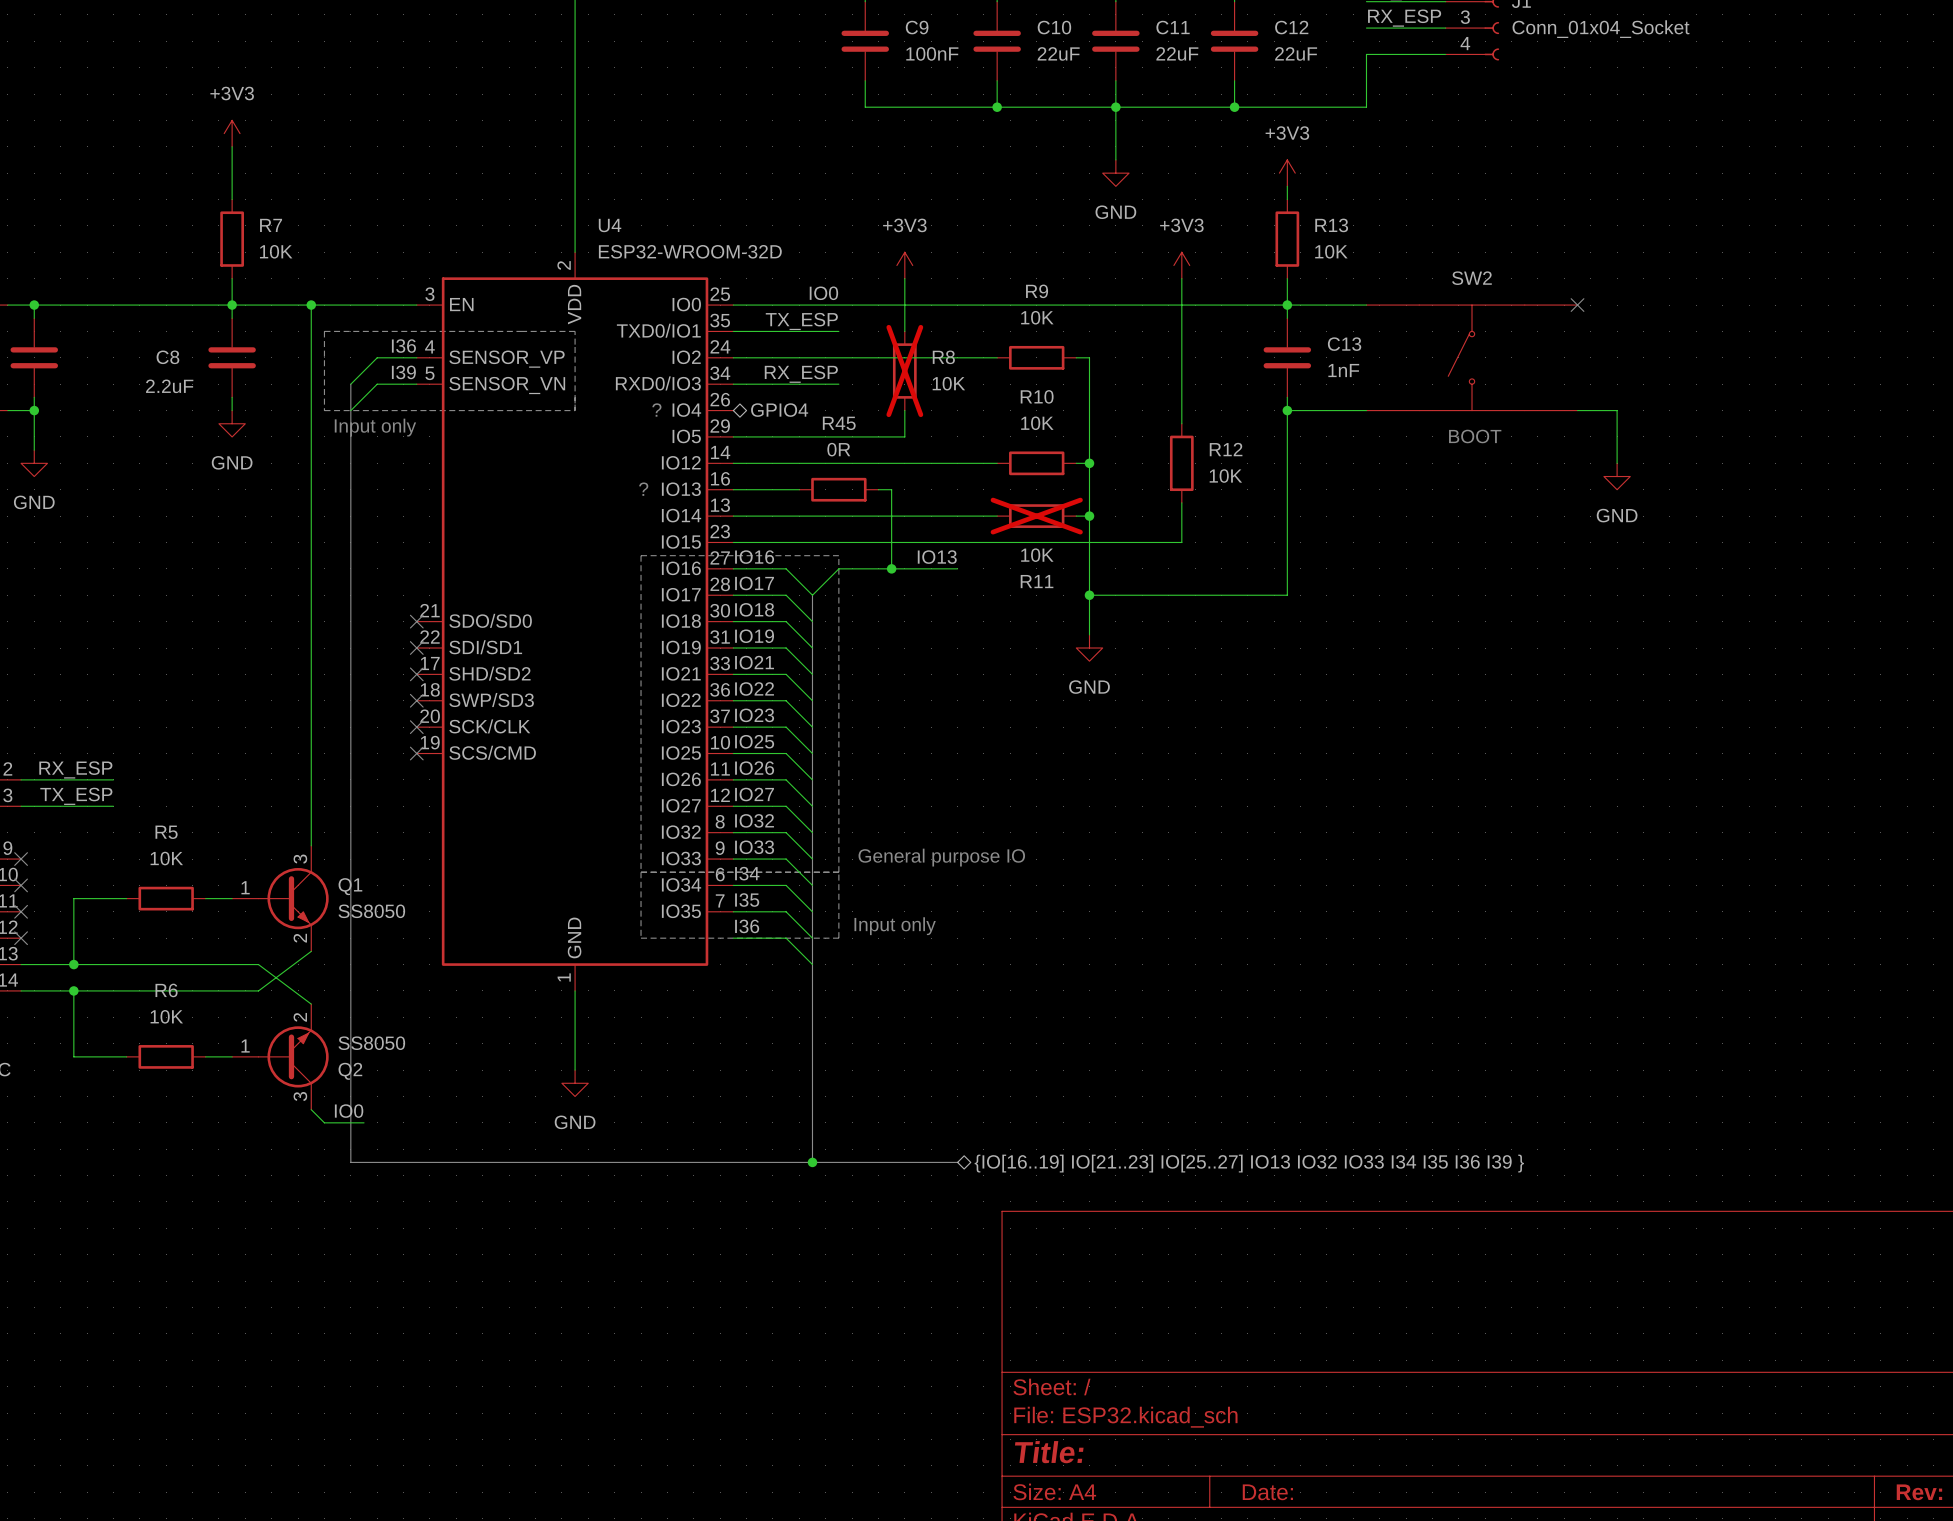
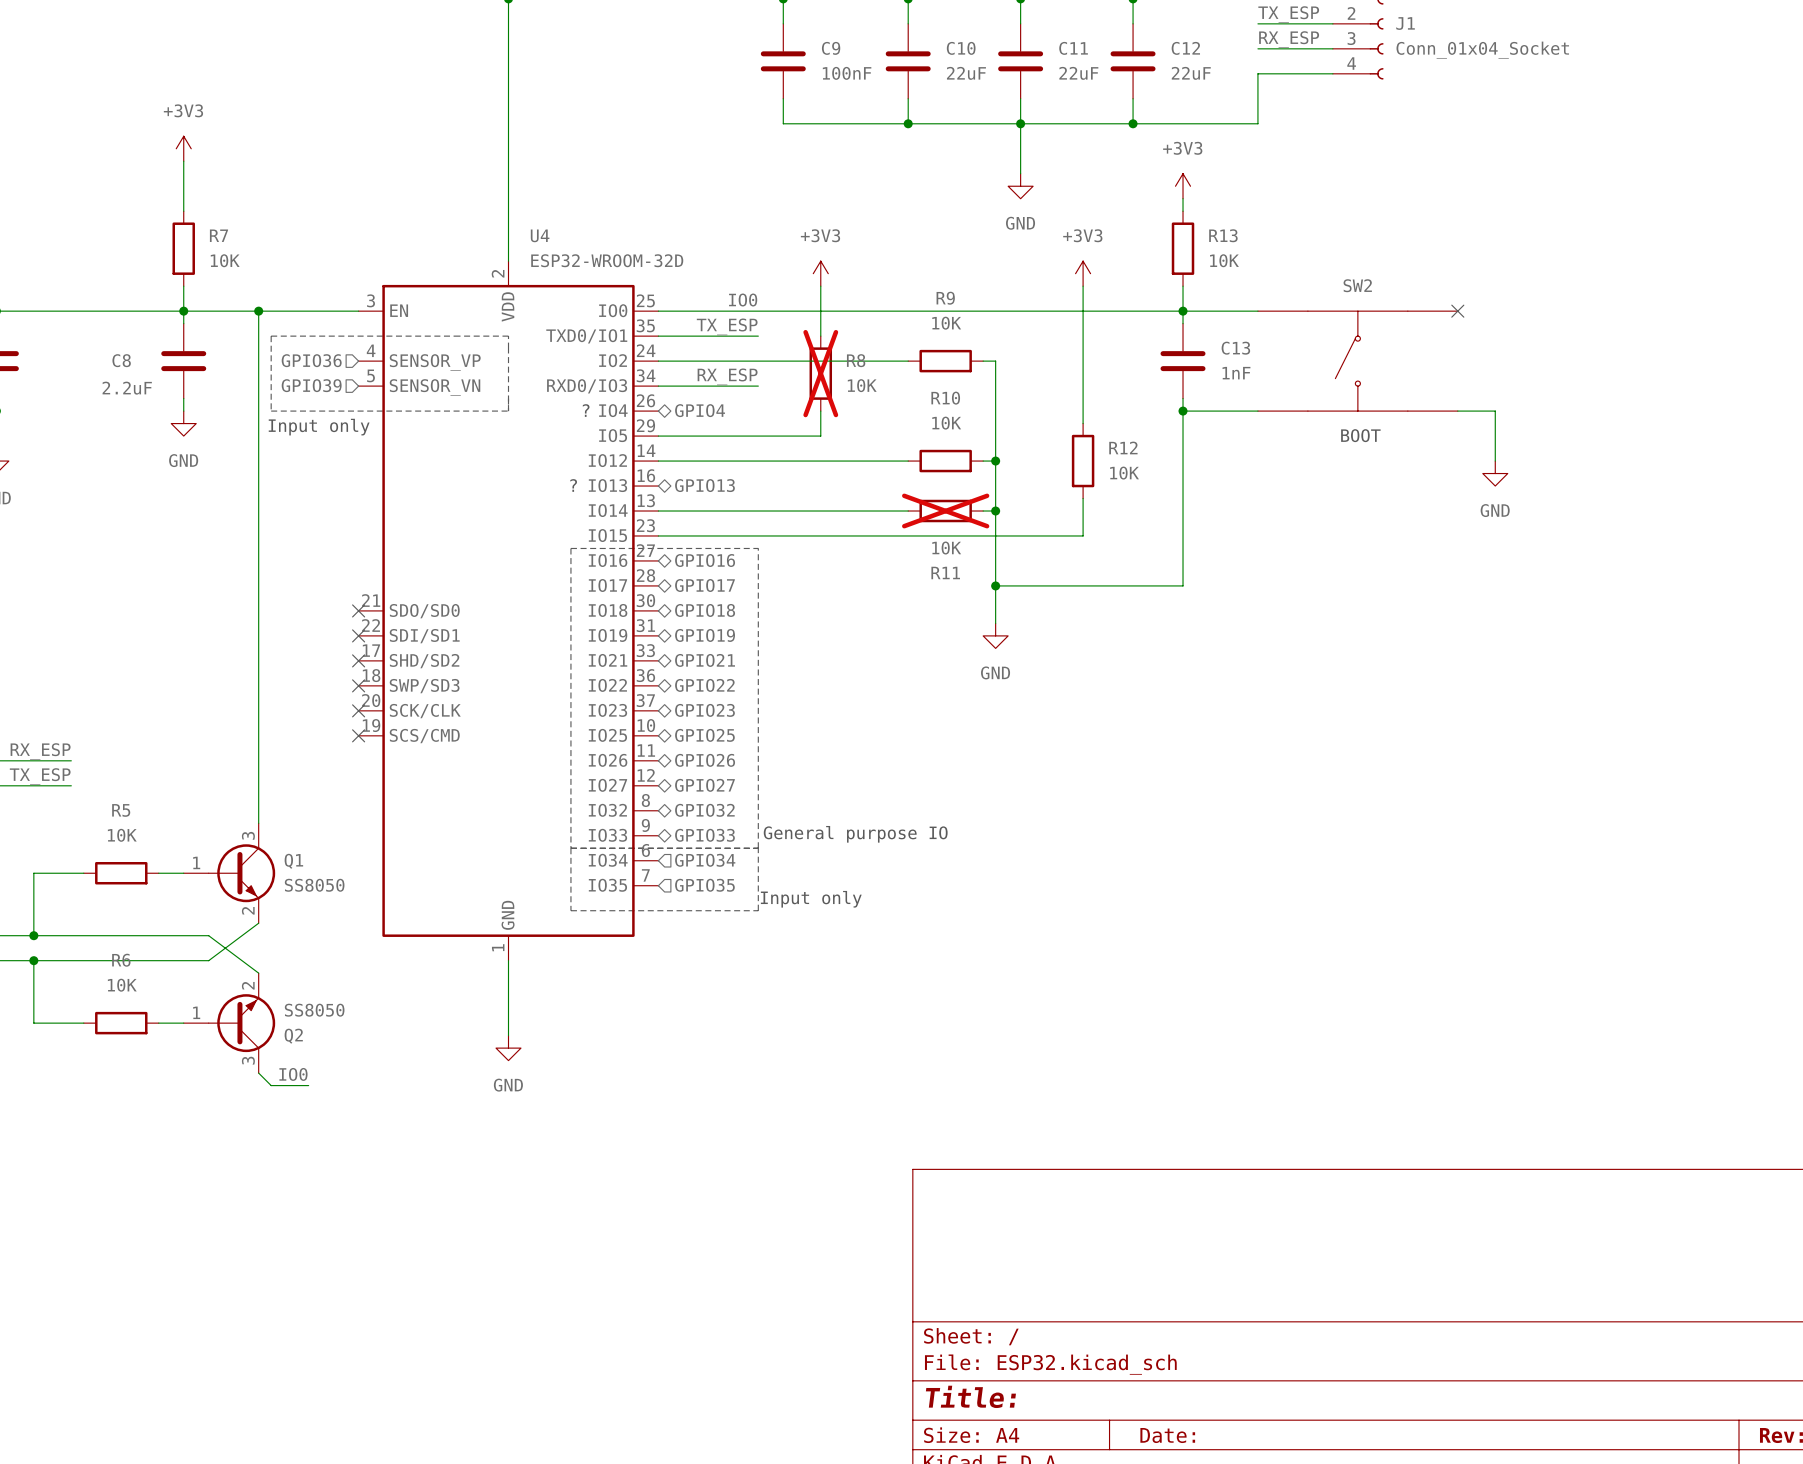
label: I36 (403, 346) -> none
hierarchical label: none -> GPIO36 (311, 360)
wire: (416, 357) (377, 357) (350, 384) -> none
label: I39 (403, 372) -> none
hierarchical label: none -> GPIO39 (311, 385)
bus: (350, 384) (350, 1162) (957, 1162) -> none
wire: (416, 384) (377, 384) (350, 410) -> none
wire: (733, 489) (799, 489) -> none
hierarchical label: none -> GPIO13 (704, 485)
R45: 0R (838, 489) -> none
wire: (878, 489) (891, 489) (891, 568) -> none
label: IO16 (754, 557) -> none
label: IO13 (937, 557) -> none
wire: (733, 568) (786, 568) (812, 595) (838, 568) (957, 568) -> none
hierarchical label: none -> GPIO16 (705, 560)
junction: (891, 568) -> none
label: IO17 (754, 583) -> none
hierarchical label: none -> GPIO17 (704, 585)
wire: (733, 595) (786, 595) (812, 621) -> none
bus: (812, 595) (812, 1162) -> none
label: IO18 (754, 609) -> none
wire: (733, 621) (786, 621) (812, 648) -> none
hierarchical label: none -> GPIO18 (705, 610)
label: IO19 (754, 636) -> none
hierarchical label: none -> GPIO19 (705, 635)
wire: (733, 648) (786, 648) (812, 674) -> none
label: IO21 (754, 662) -> none
hierarchical label: none -> GPIO21 (705, 660)
wire: (733, 674) (786, 674) (812, 700) -> none
label: IO22 (754, 688) -> none
wire: (733, 700) (786, 700) (812, 727) -> none
hierarchical label: none -> GPIO22 (704, 685)
label: IO23 (754, 715) -> none
hierarchical label: none -> GPIO23 (704, 710)
wire: (733, 727) (786, 727) (812, 753) -> none
label: IO25 (754, 741) -> none
wire: (733, 753) (786, 753) (812, 779) -> none
hierarchical label: none -> GPIO25 (704, 735)
label: IO26 (754, 768) -> none
wire: (733, 779) (786, 779) (812, 806) -> none
hierarchical label: none -> GPIO26 (705, 760)
label: IO27 (754, 794) -> none
hierarchical label: none -> GPIO27 (704, 785)
wire: (733, 806) (786, 806) (812, 832) -> none
label: IO32 (754, 820) -> none
wire: (733, 832) (786, 832) (812, 859) -> none
hierarchical label: none -> GPIO32 (704, 810)
label: IO33 (754, 847) -> none
hierarchical label: none -> GPIO33 (704, 835)
wire: (733, 859) (786, 859) (812, 885) -> none
label: I34 (747, 873) -> none
hierarchical label: none -> GPIO34 (705, 860)
wire: (733, 885) (786, 885) (812, 911) -> none
label: I35 (747, 900) -> none
wire: (733, 911) (786, 911) (812, 938) -> none
hierarchical label: none -> GPIO35 (704, 885)
label: I36 (747, 926) -> none
wire: (733, 938) (786, 938) (812, 964) -> none
junction: (812, 1162) -> none
hierarchical label: {IO[16..19] IO[21..23] IO[25..27] IO13 IO32 IO33 I34 I35 I36 I39 } (1249, 1163) -> none

